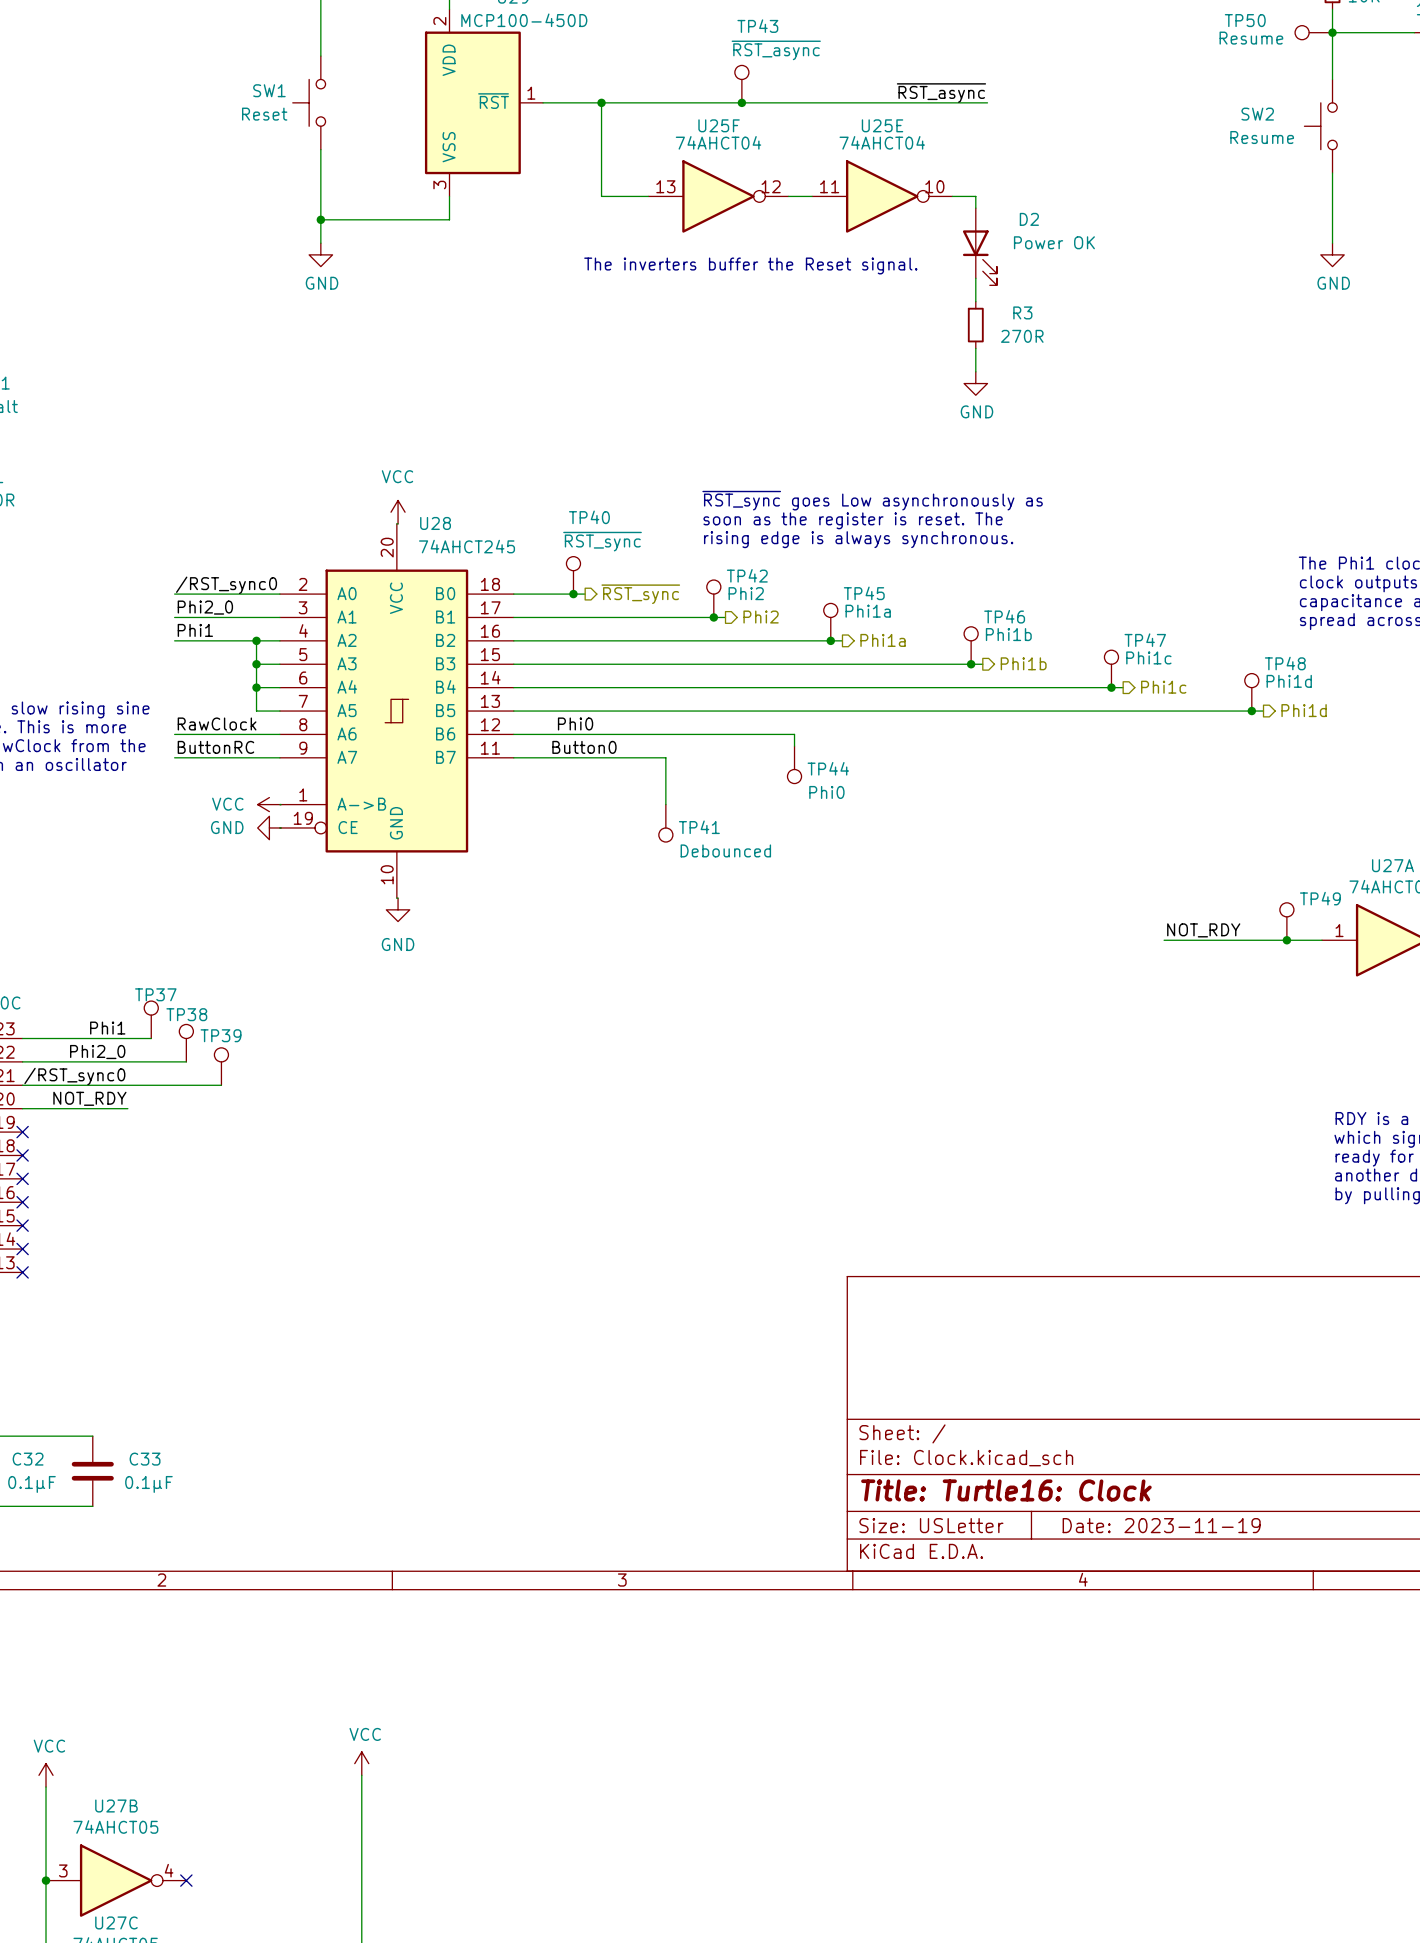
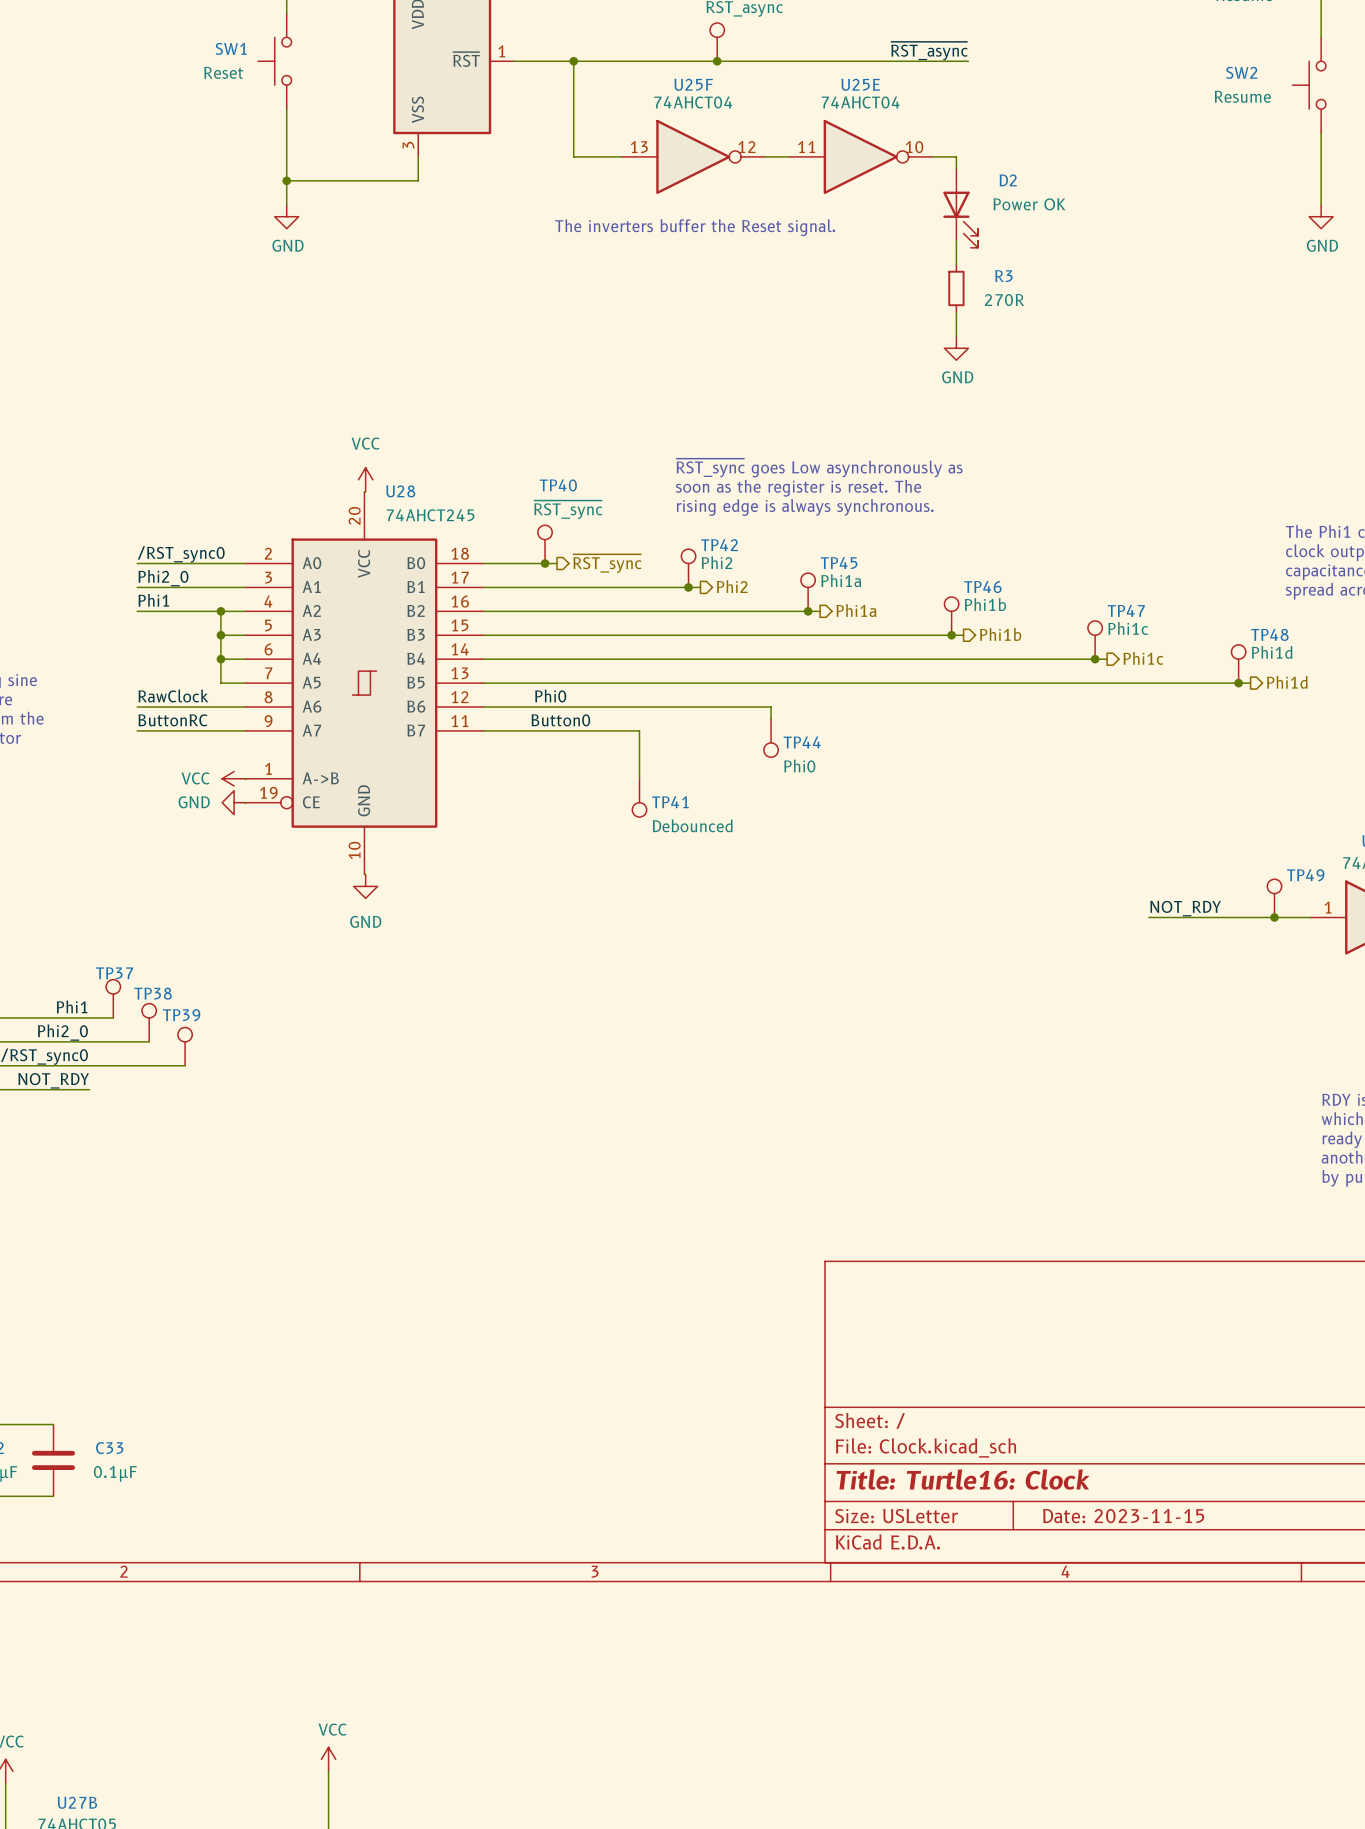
title block: Date: 2023-11-19 (1161, 1525) -> Date: 2023-11-15 (1123, 1516)

